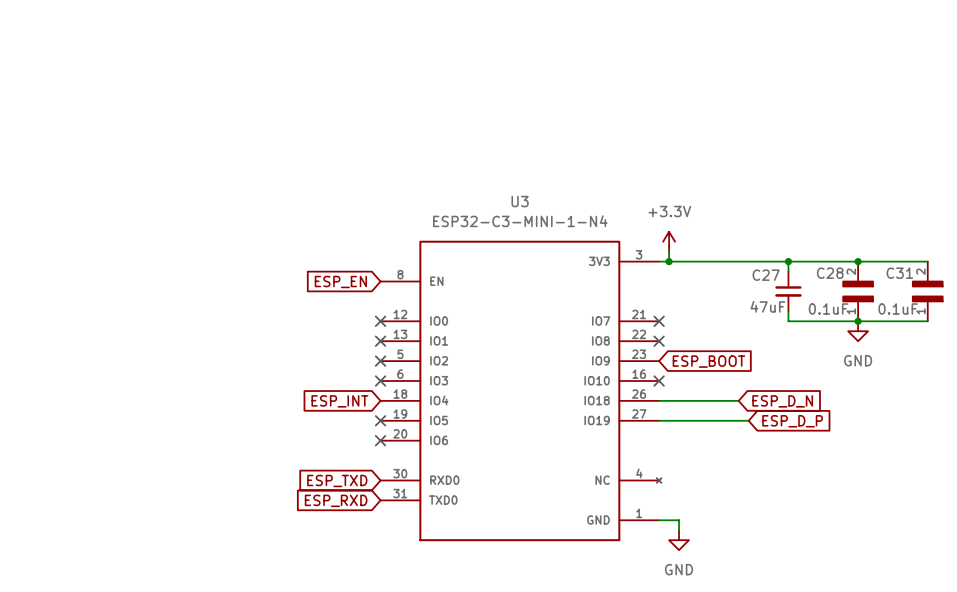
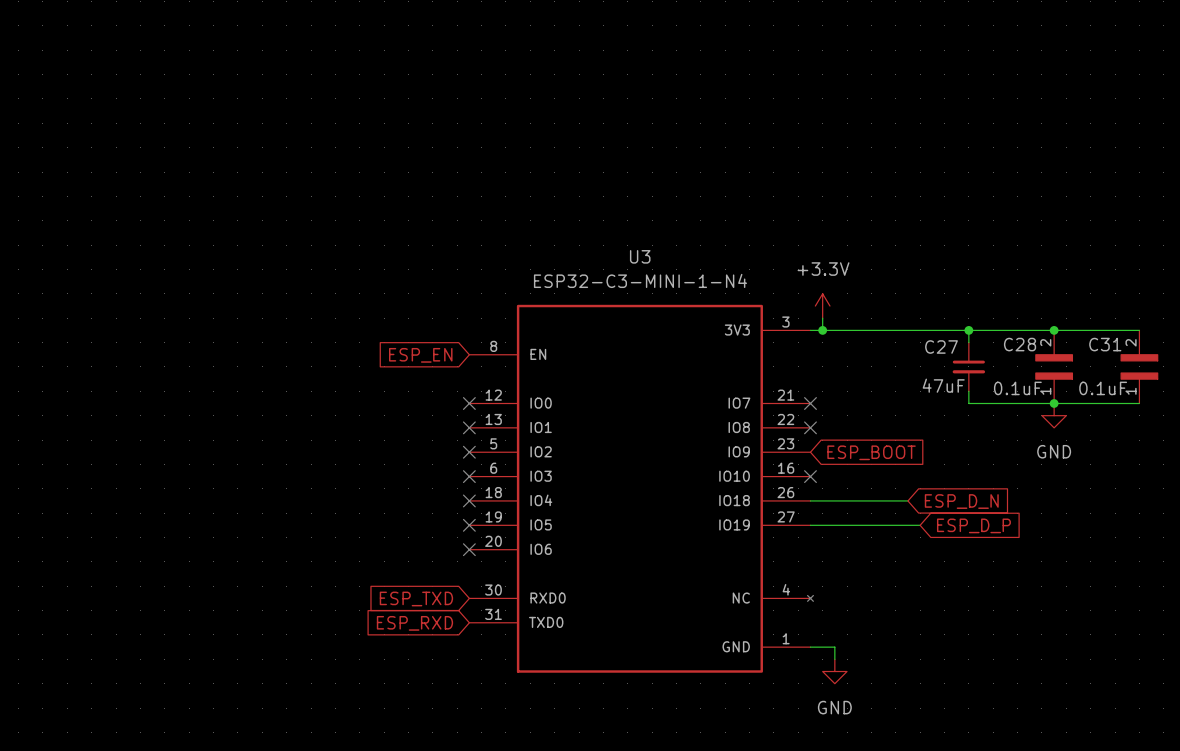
no-connect mark: none -> (469, 500)
global label: ESP_INT (339, 401) -> none

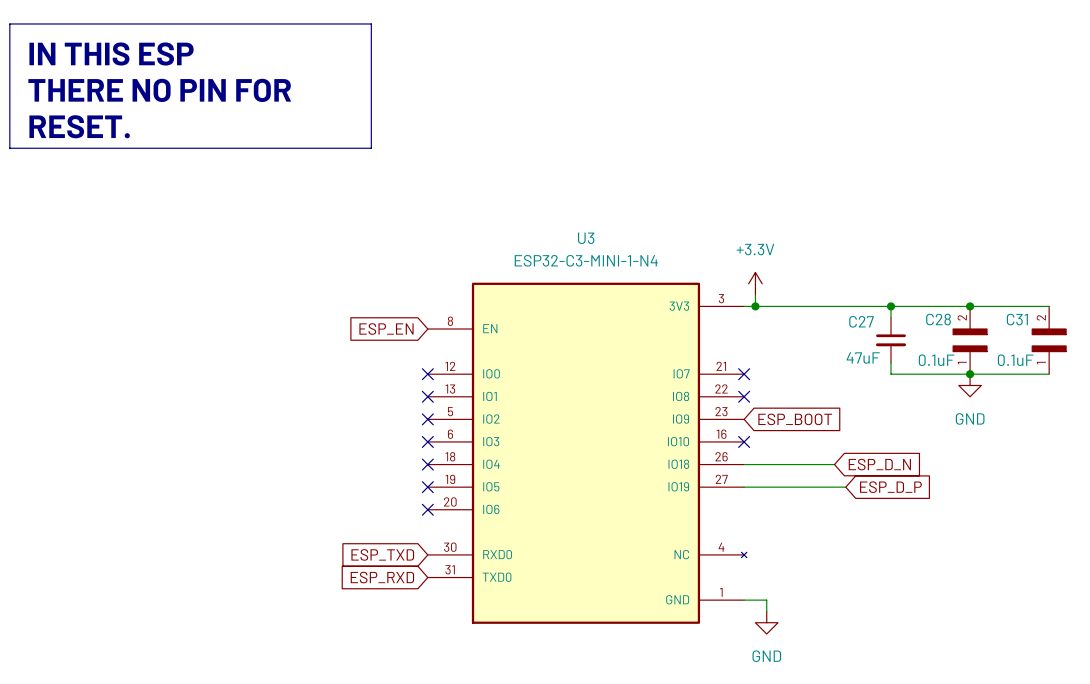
line: none -> (9, 23) (371, 23) (371, 148) (9, 148) (9, 23)
text: none -> IN THIS ESP (111, 53)
text: none -> THERE NO PIN FOR (159, 90)
text: none -> RESET. (79, 126)

